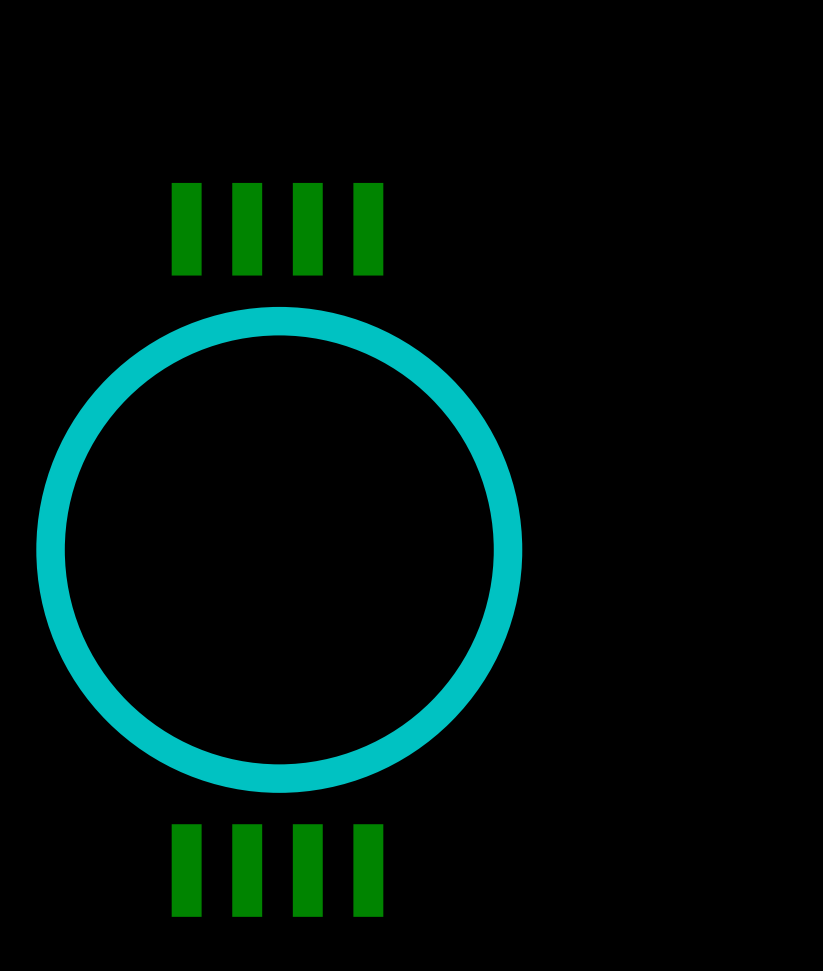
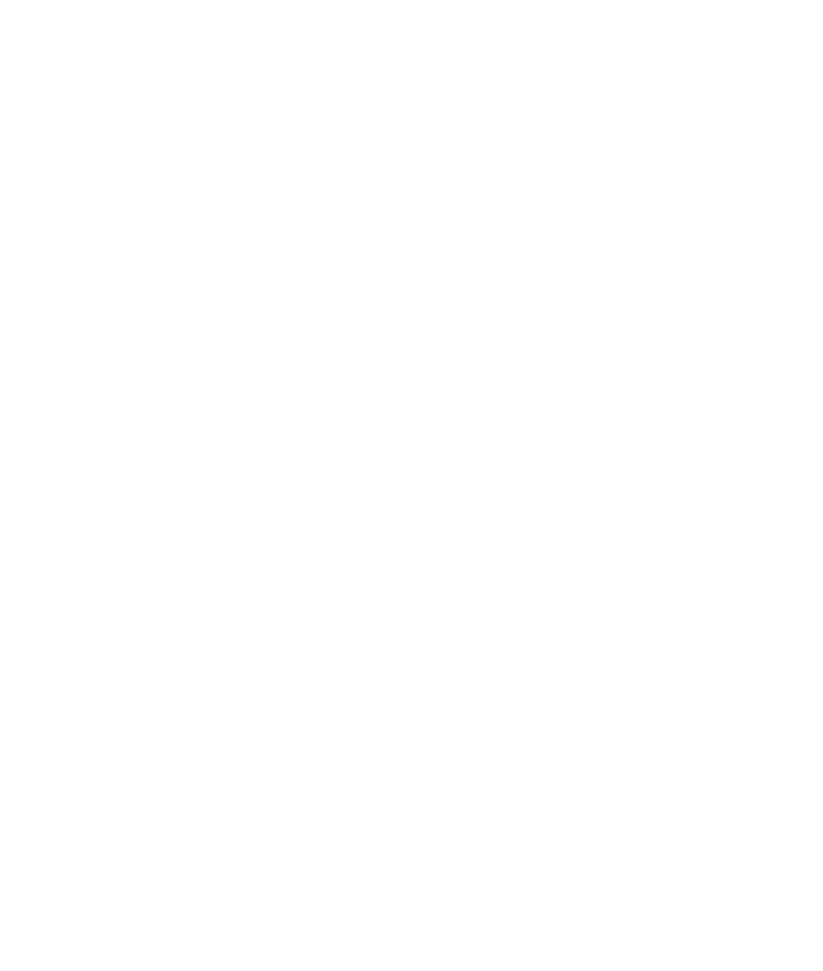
part: (279, 549) -> none

